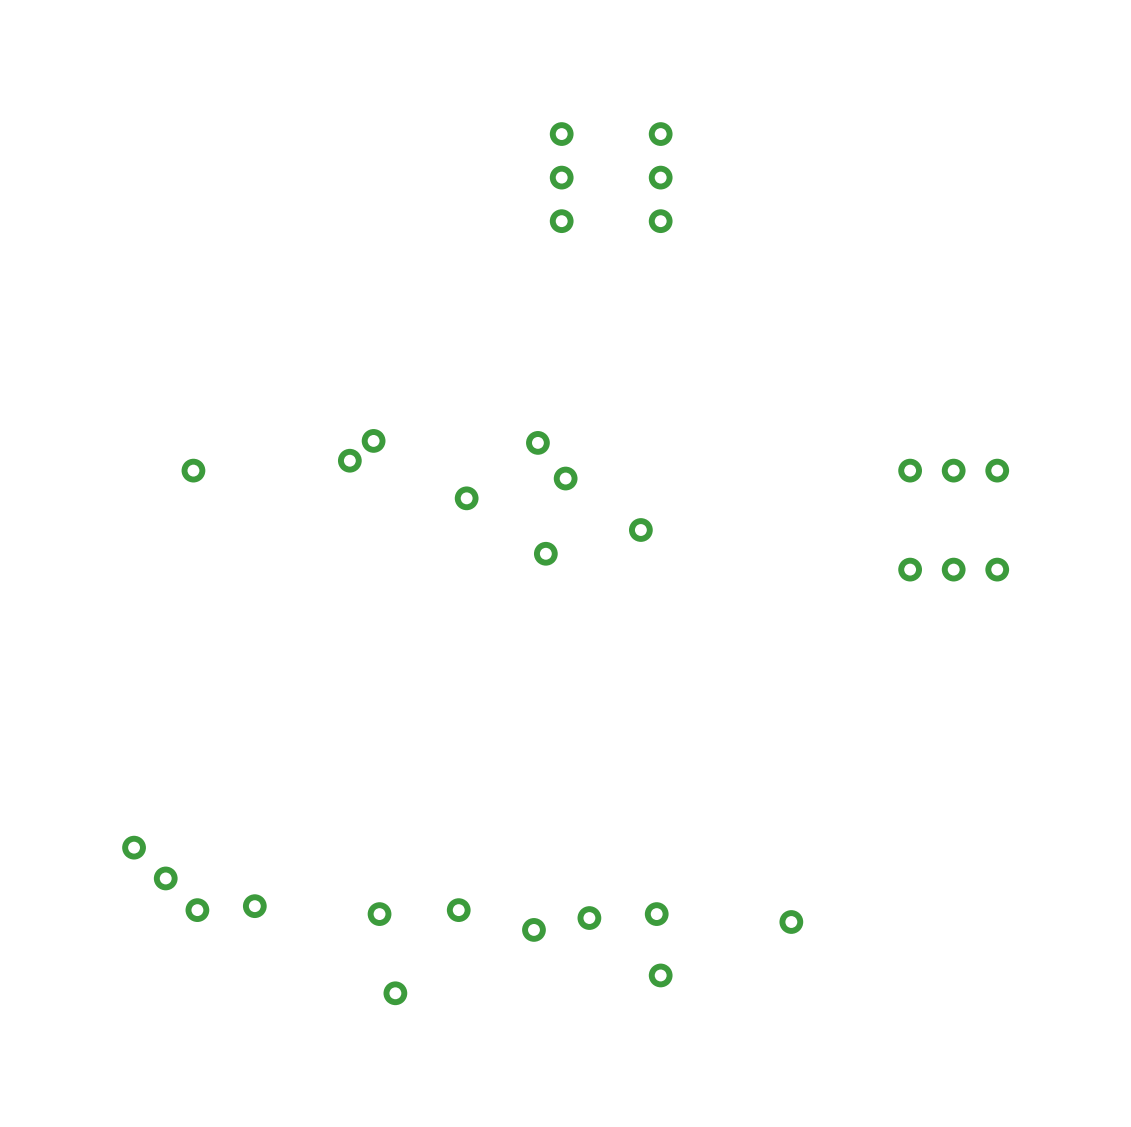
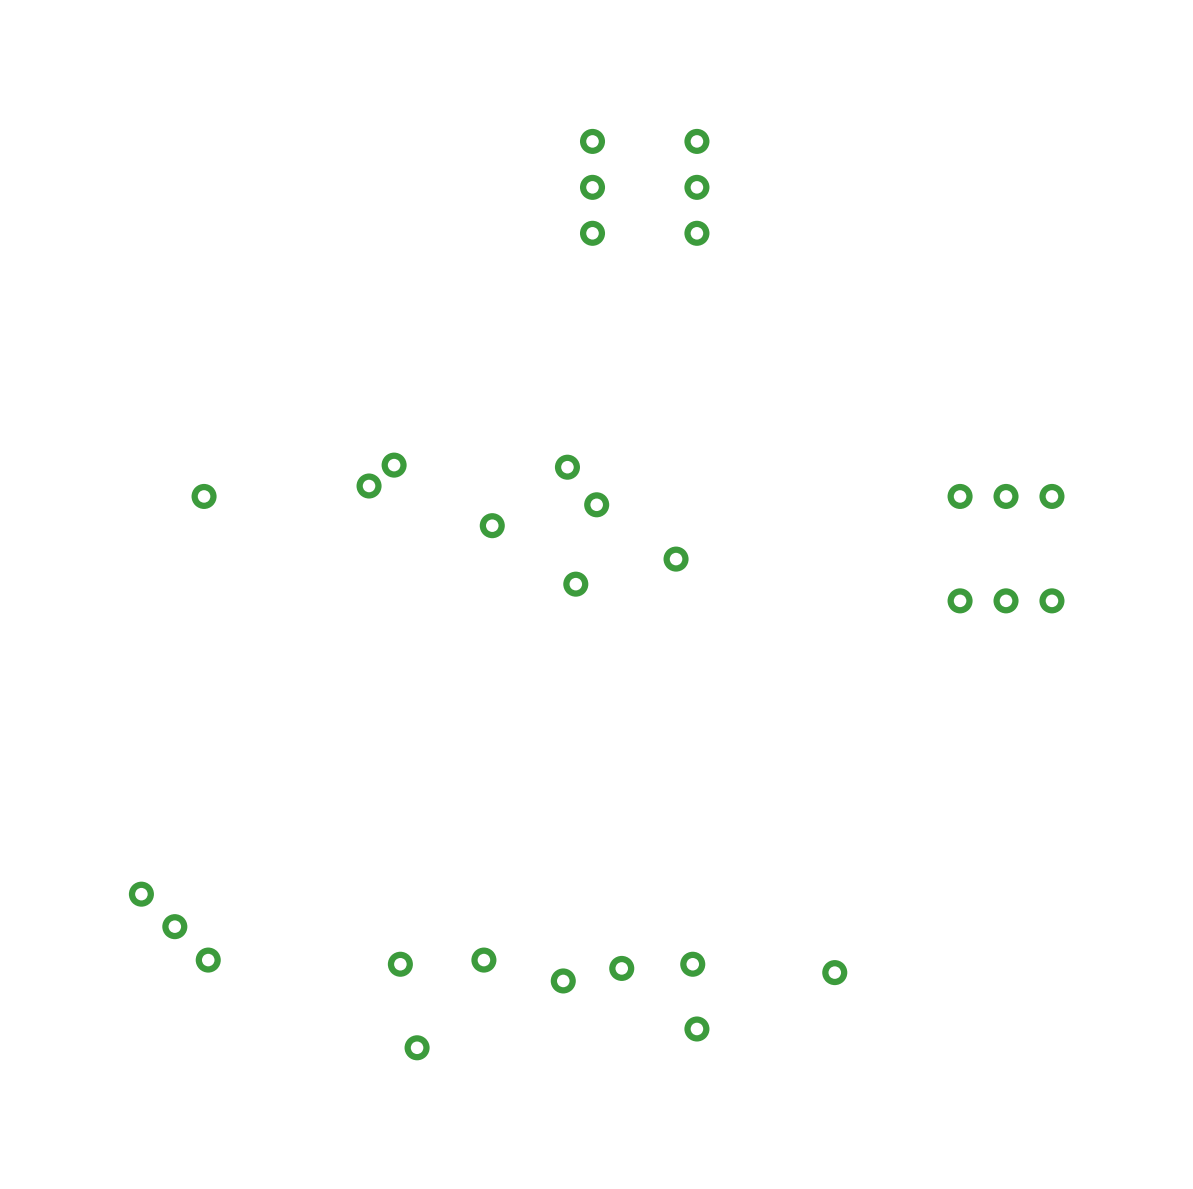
via: (254, 906) -> none

